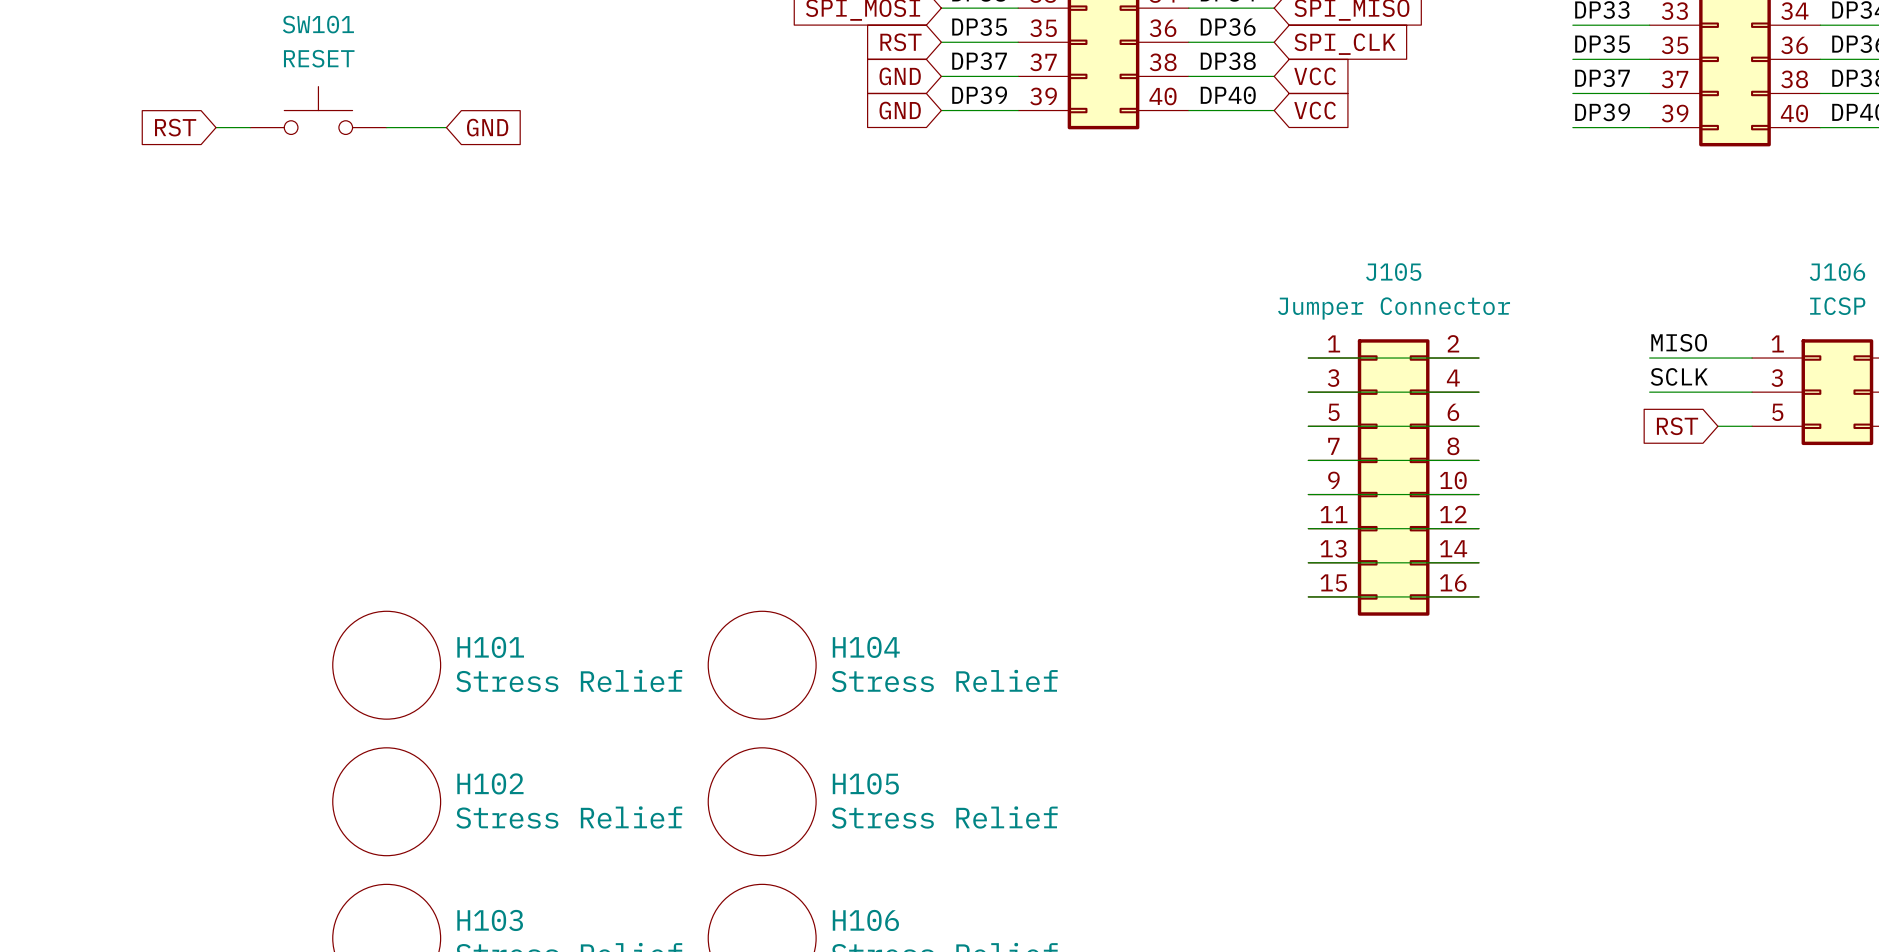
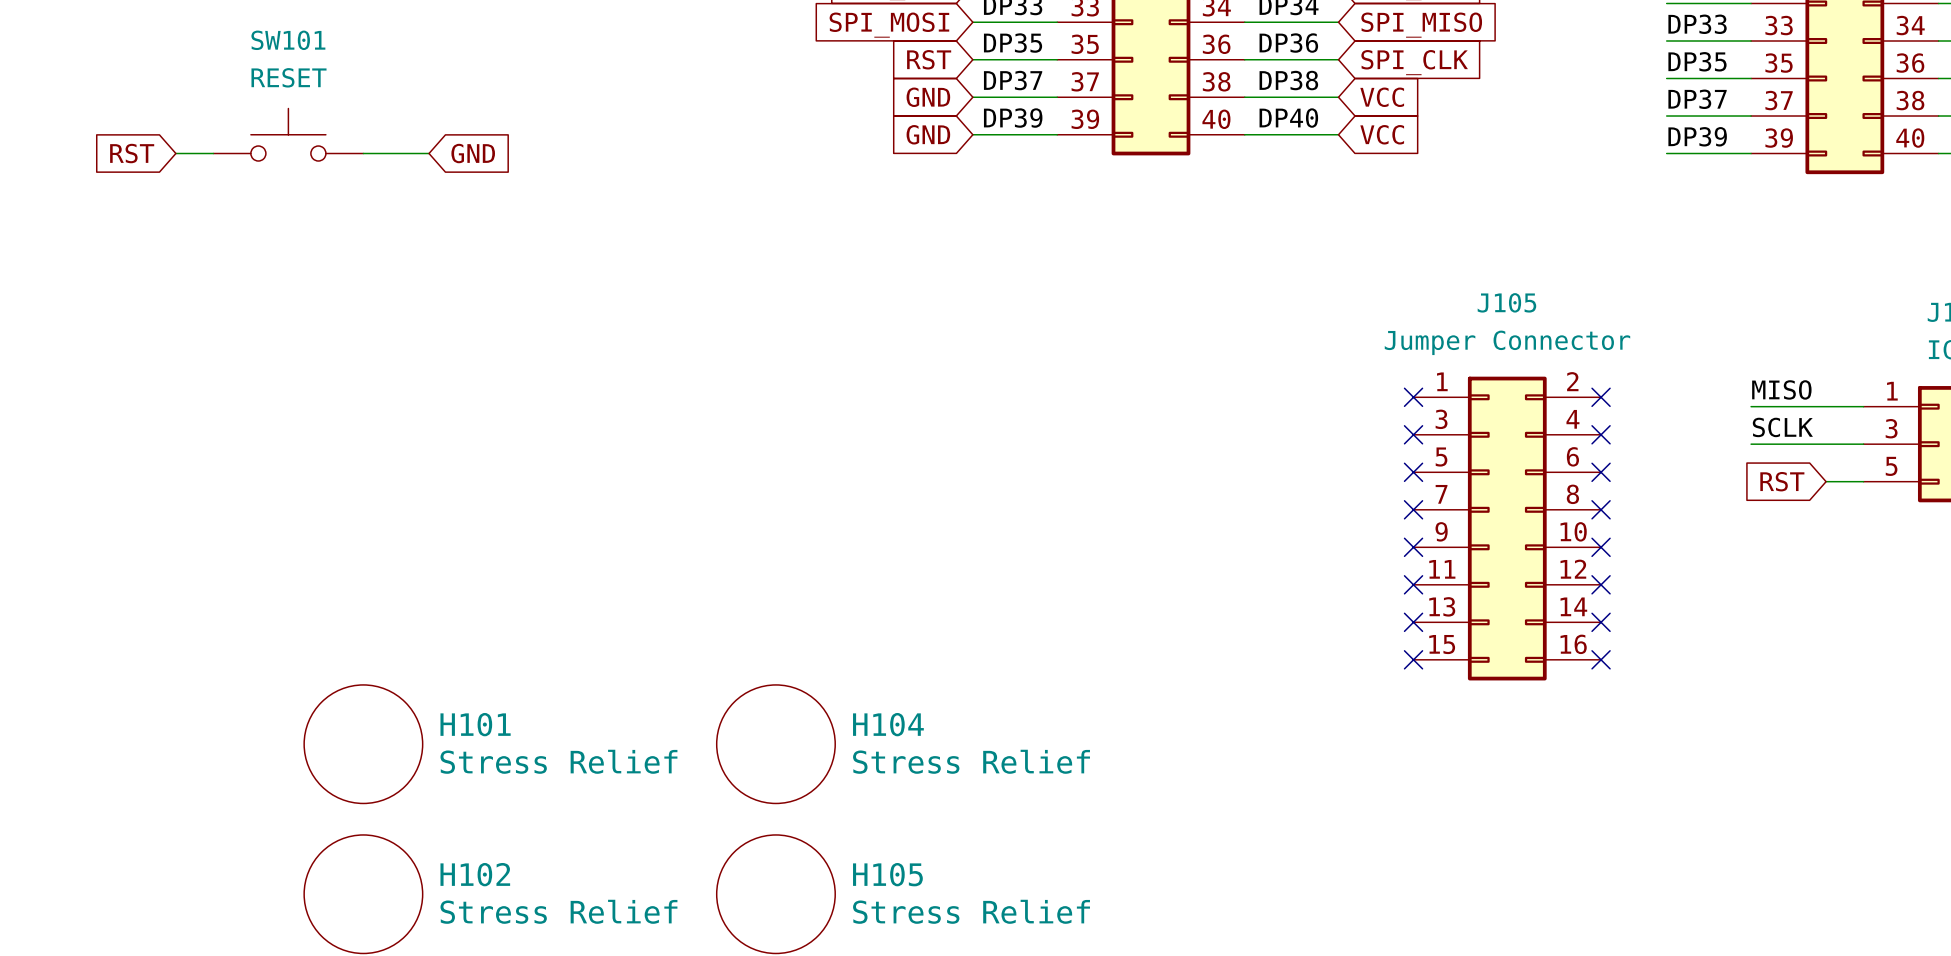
no-connect mark: none -> (1413, 397)
no-connect mark: none -> (1601, 397)
wire: (1308, 358) (1478, 358) -> none
no-connect mark: none -> (1413, 434)
no-connect mark: none -> (1601, 434)
wire: (1308, 392) (1478, 392) -> none
no-connect mark: none -> (1413, 472)
no-connect mark: none -> (1601, 472)
wire: (1308, 426) (1478, 426) -> none
no-connect mark: none -> (1413, 509)
no-connect mark: none -> (1601, 509)
wire: (1308, 460) (1478, 460) -> none
J105 position: (1393, 477) -> (1507, 528)
no-connect mark: none -> (1413, 547)
no-connect mark: none -> (1601, 547)
wire: (1308, 494) (1478, 494) -> none
no-connect mark: none -> (1413, 584)
no-connect mark: none -> (1601, 584)
wire: (1308, 528) (1478, 528) -> none
no-connect mark: none -> (1413, 622)
no-connect mark: none -> (1601, 622)
wire: (1308, 562) (1478, 562) -> none
no-connect mark: none -> (1413, 659)
no-connect mark: none -> (1601, 659)
wire: (1308, 596) (1478, 596) -> none

